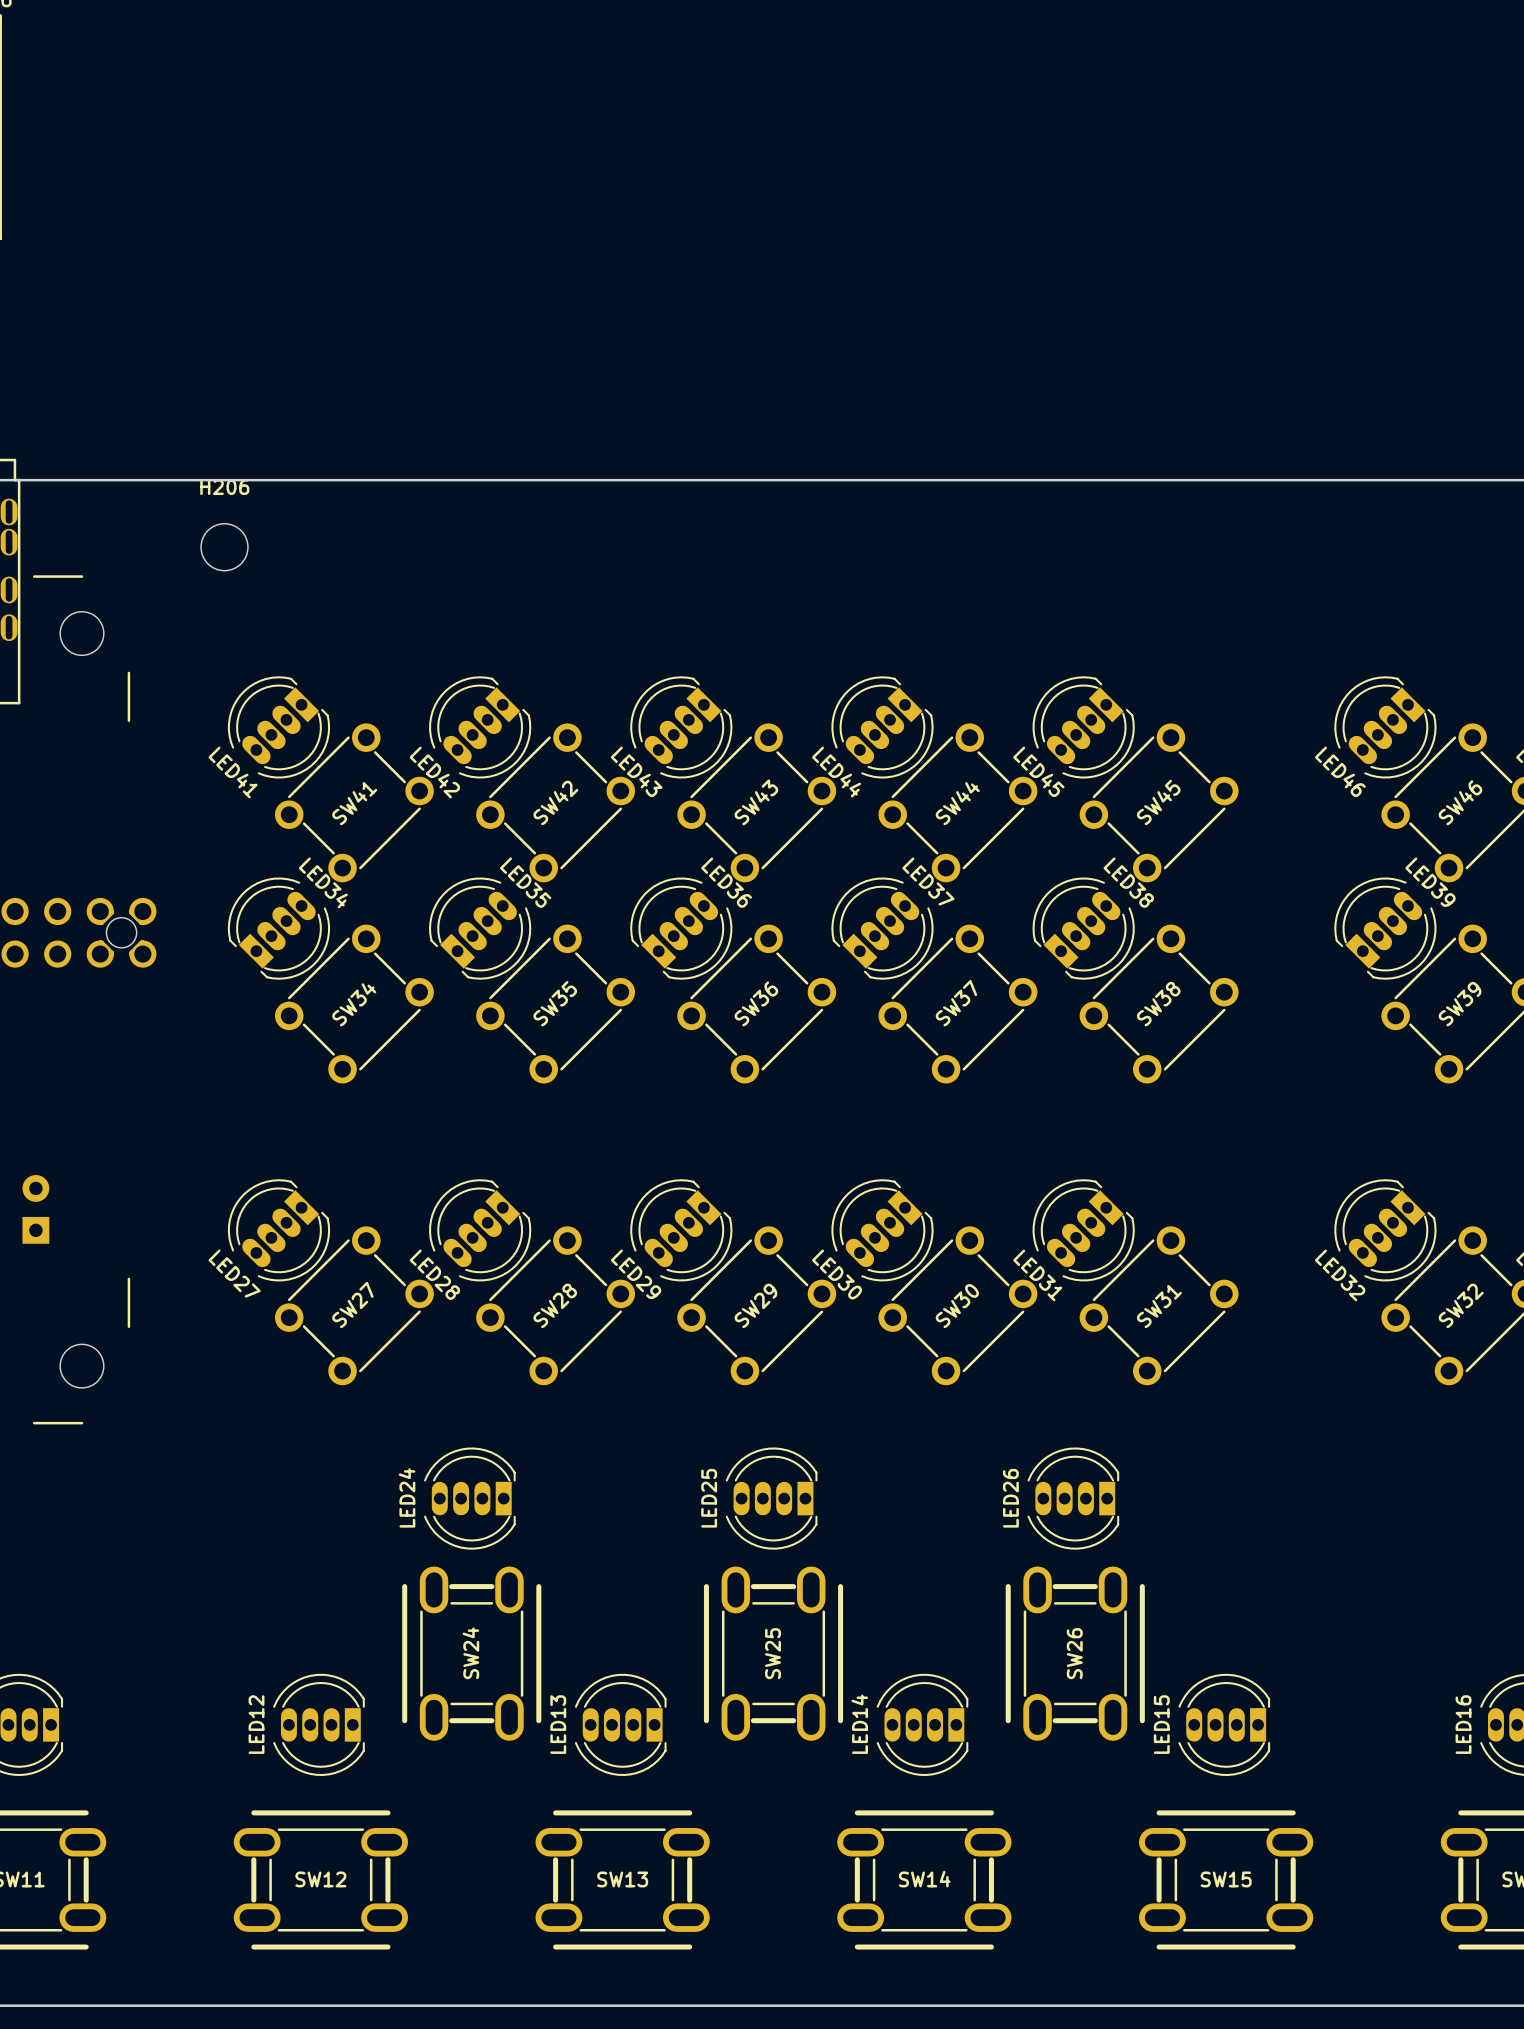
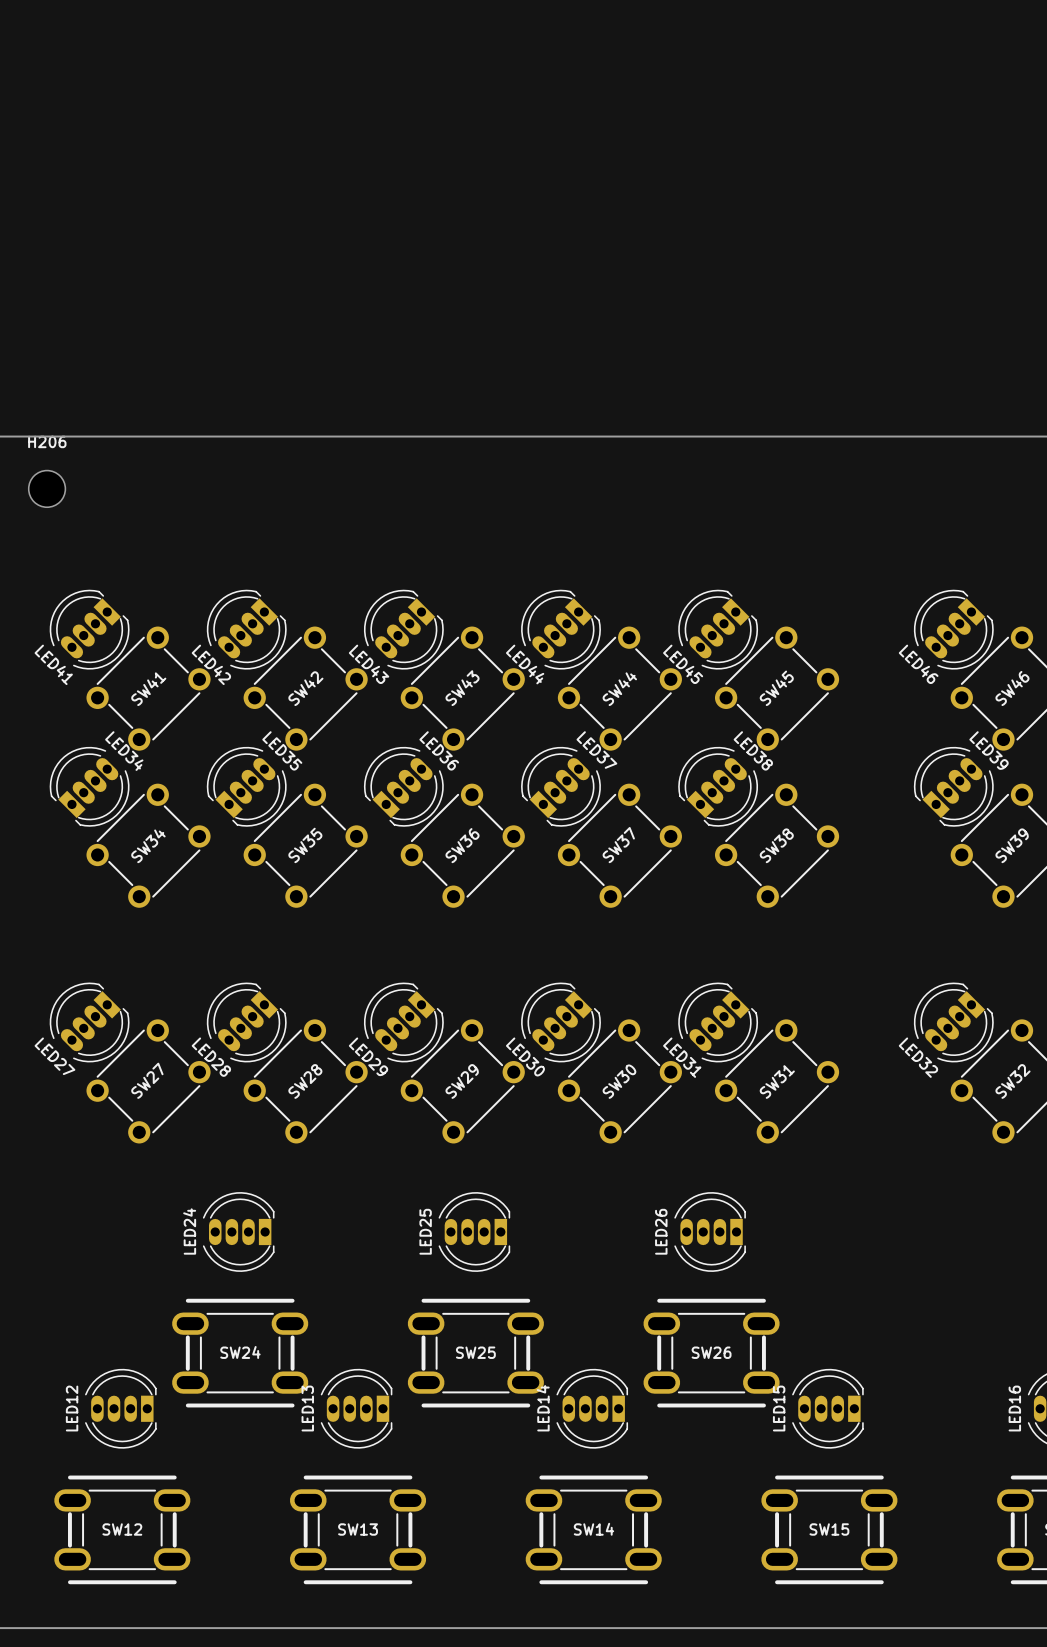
SW24 rotation: 0° (471, 1653) -> 90° clockwise (240, 1353)
SW25 rotation: 0° (773, 1653) -> 90° clockwise (475, 1353)
SW26 rotation: 0° (1075, 1653) -> 90° clockwise (711, 1353)

